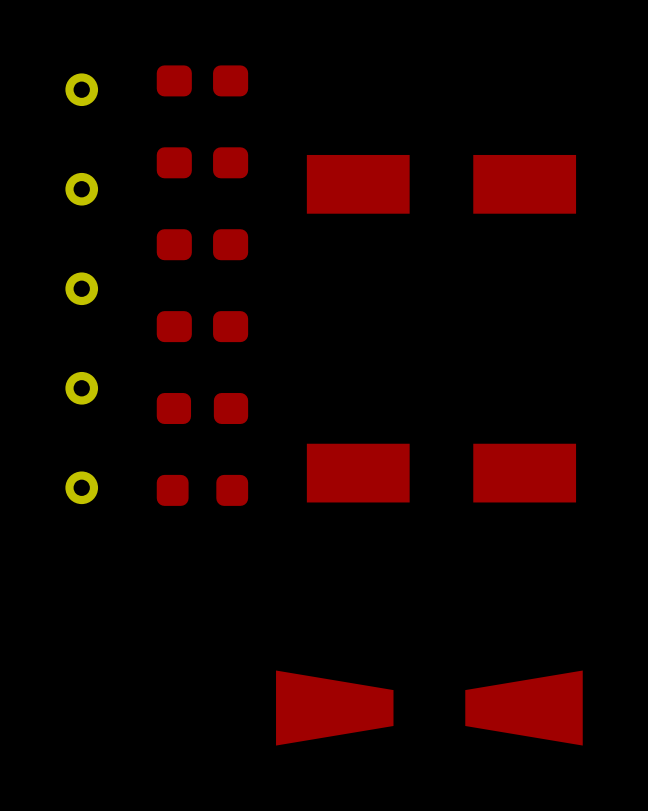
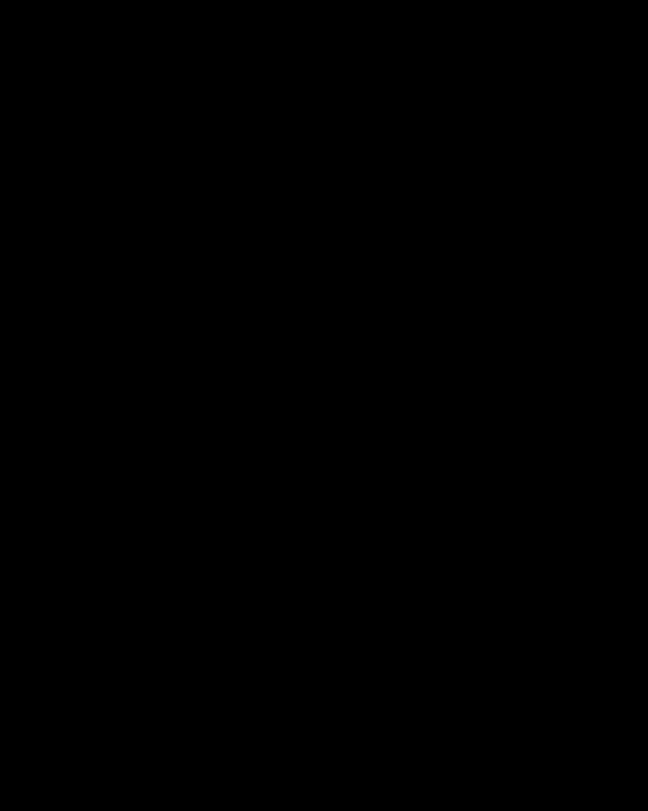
part: (202, 80) -> none
part: (81, 89) -> none
part: (202, 162) -> none
part: (441, 184) -> none
part: (81, 189) -> none
part: (202, 244) -> none
part: (81, 288) -> none
part: (202, 326) -> none
part: (81, 388) -> none
part: (202, 408) -> none
part: (441, 473) -> none
part: (81, 487) -> none
part: (202, 490) -> none
part: (429, 708) -> none

